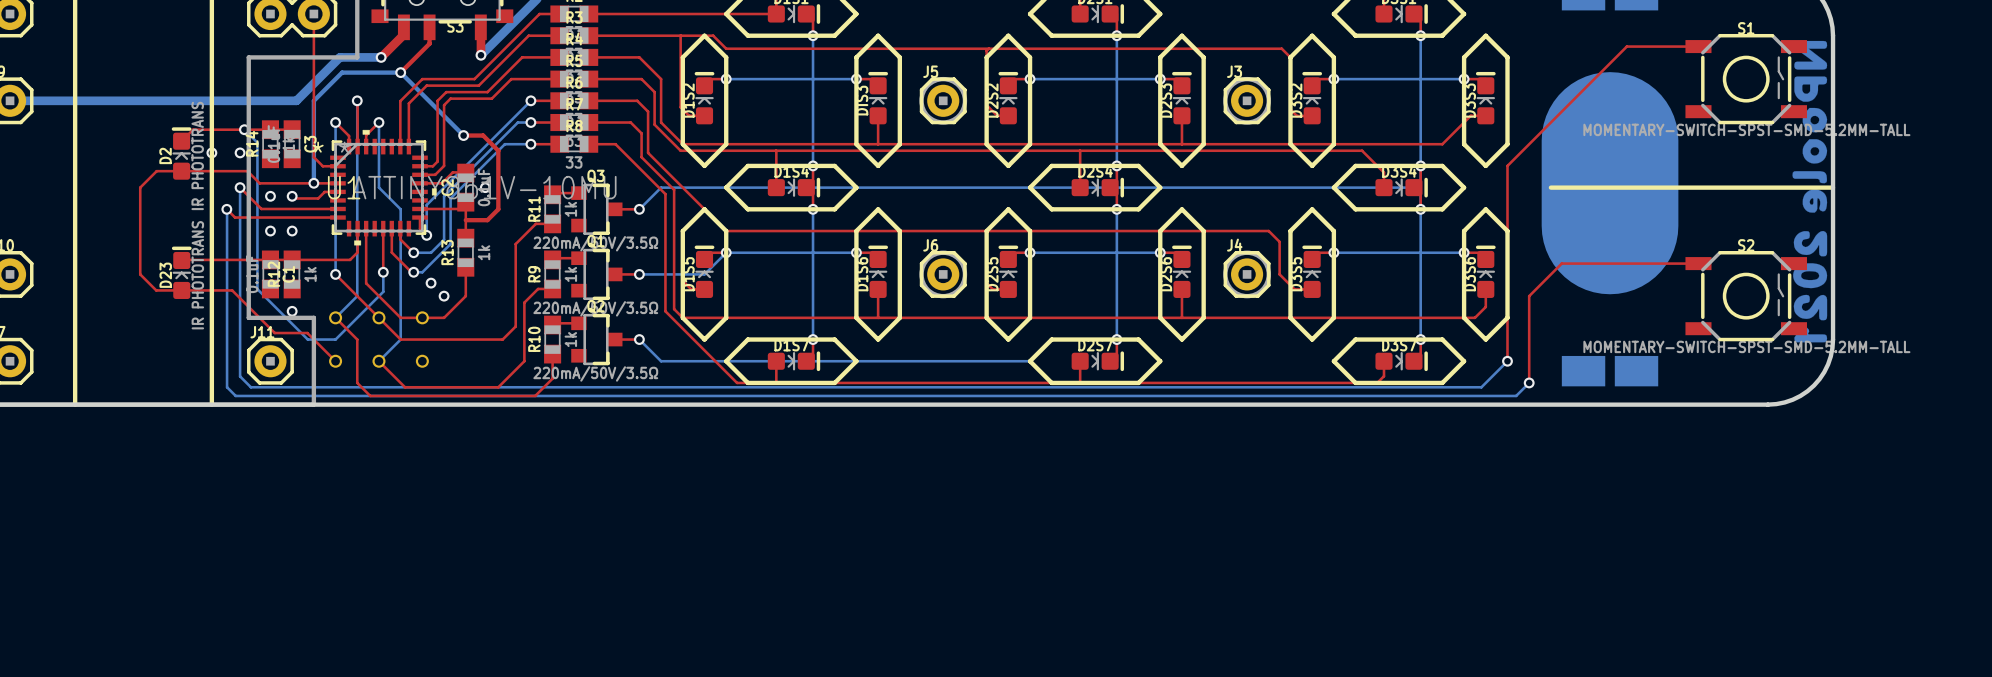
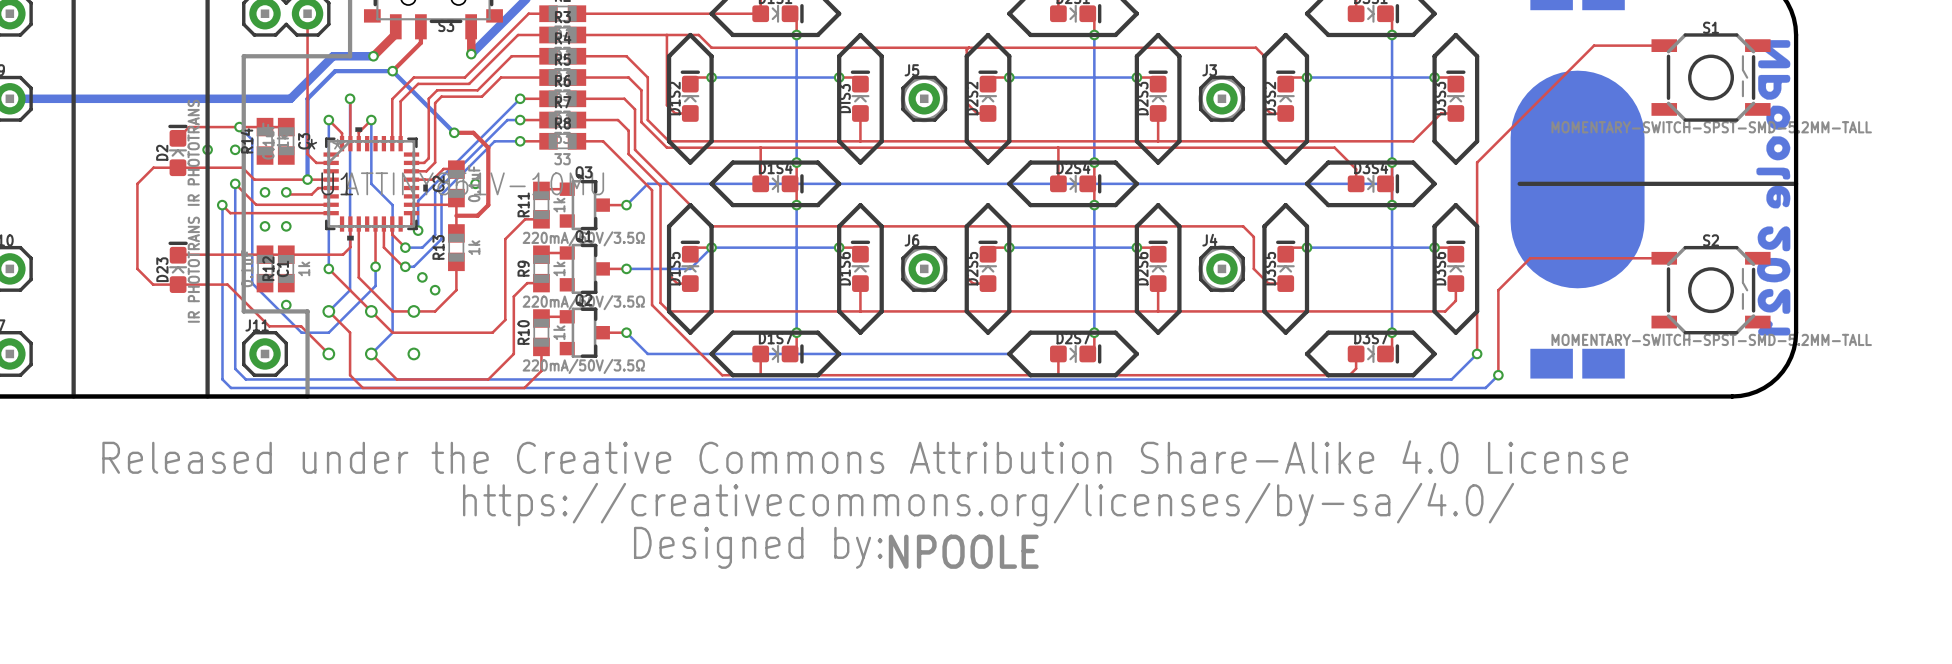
drawing: none -> [102, 440, 1629, 569]
text: none -> NPOOLE (963, 551)

